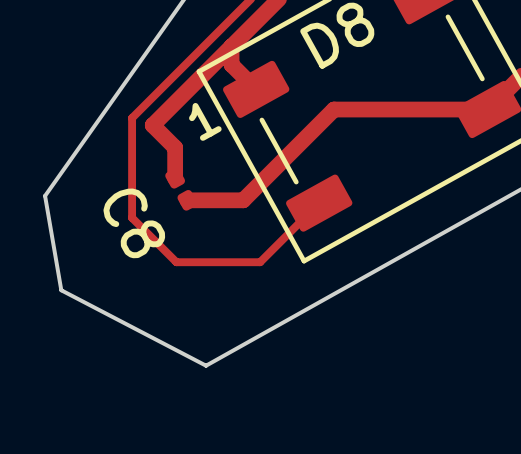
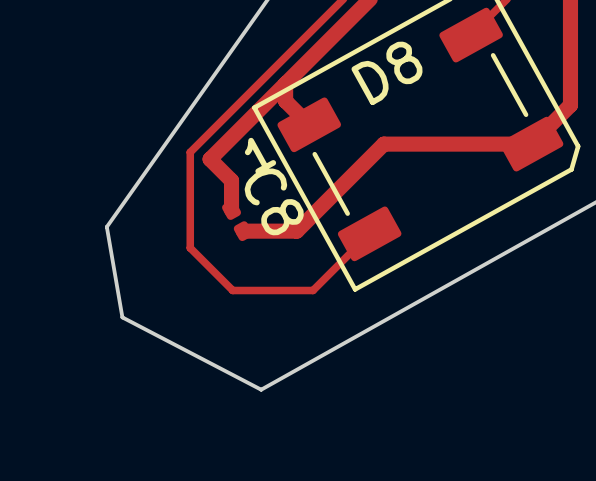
C8 name position: C8 (134, 223) -> C8 (274, 201)

